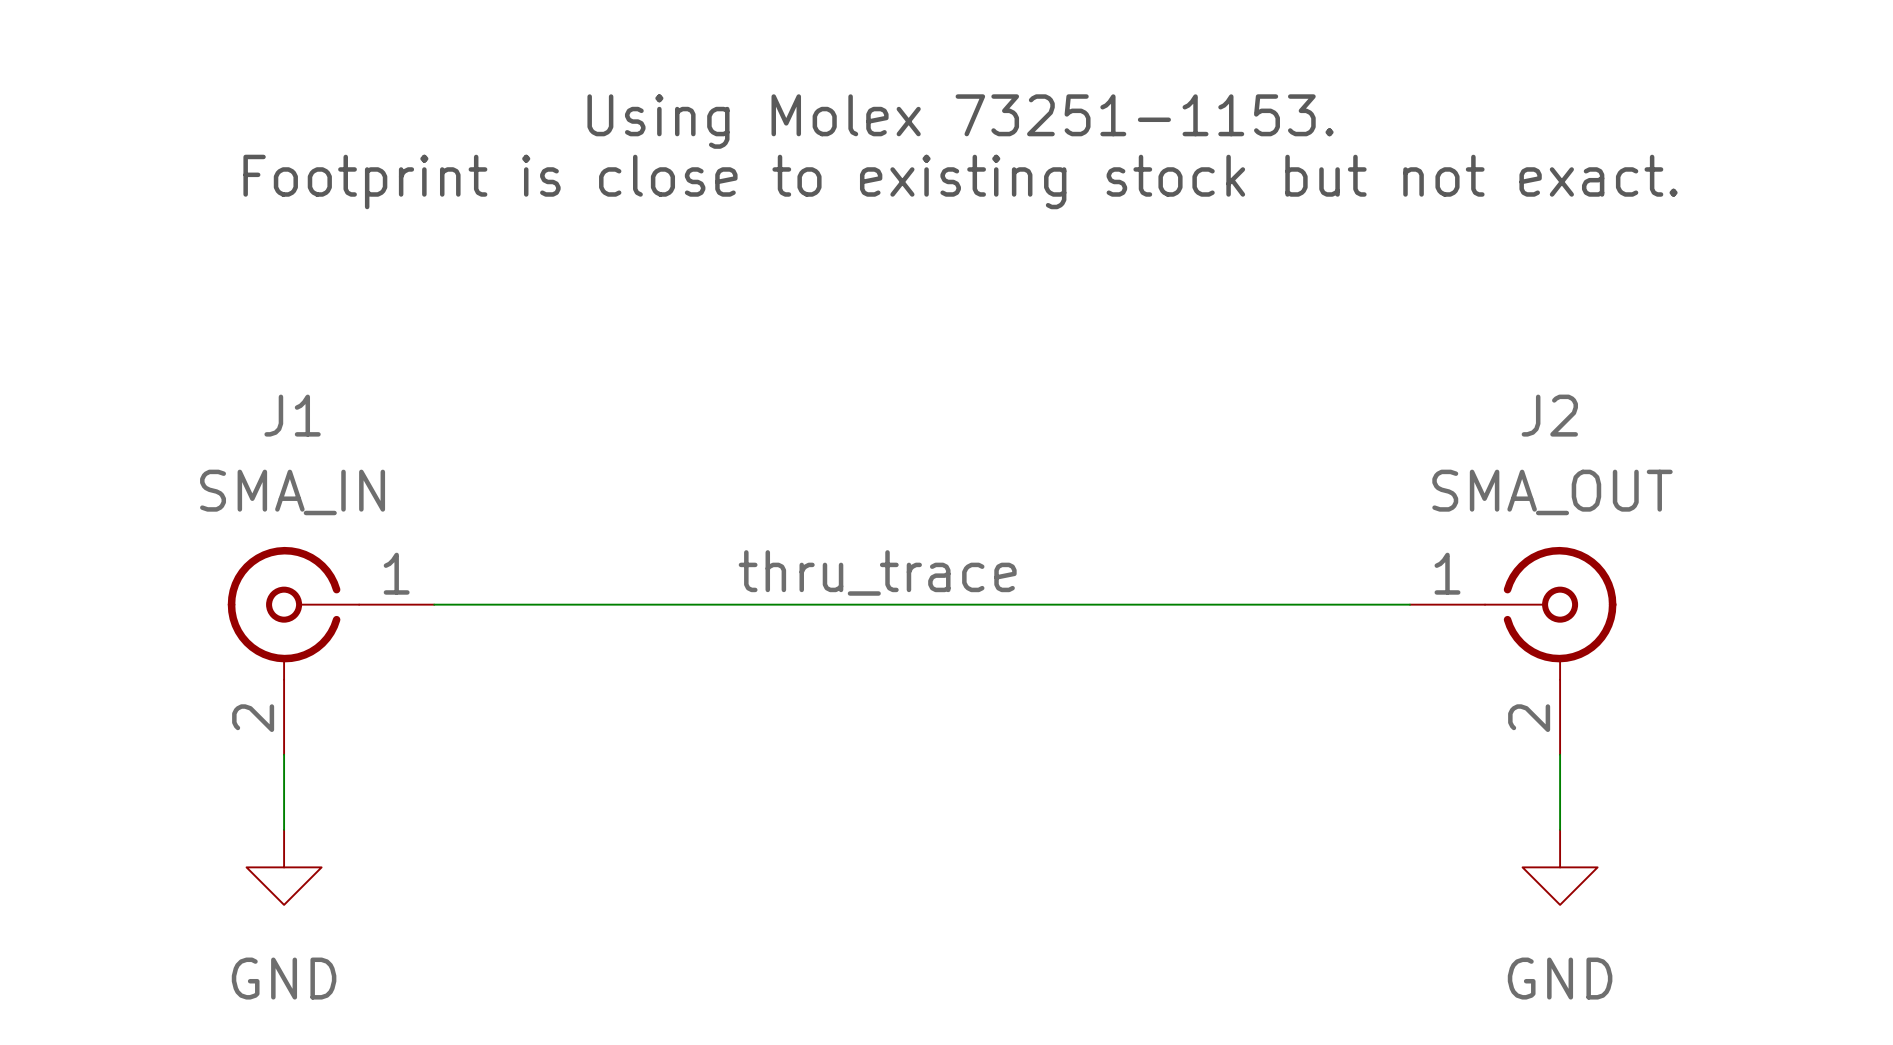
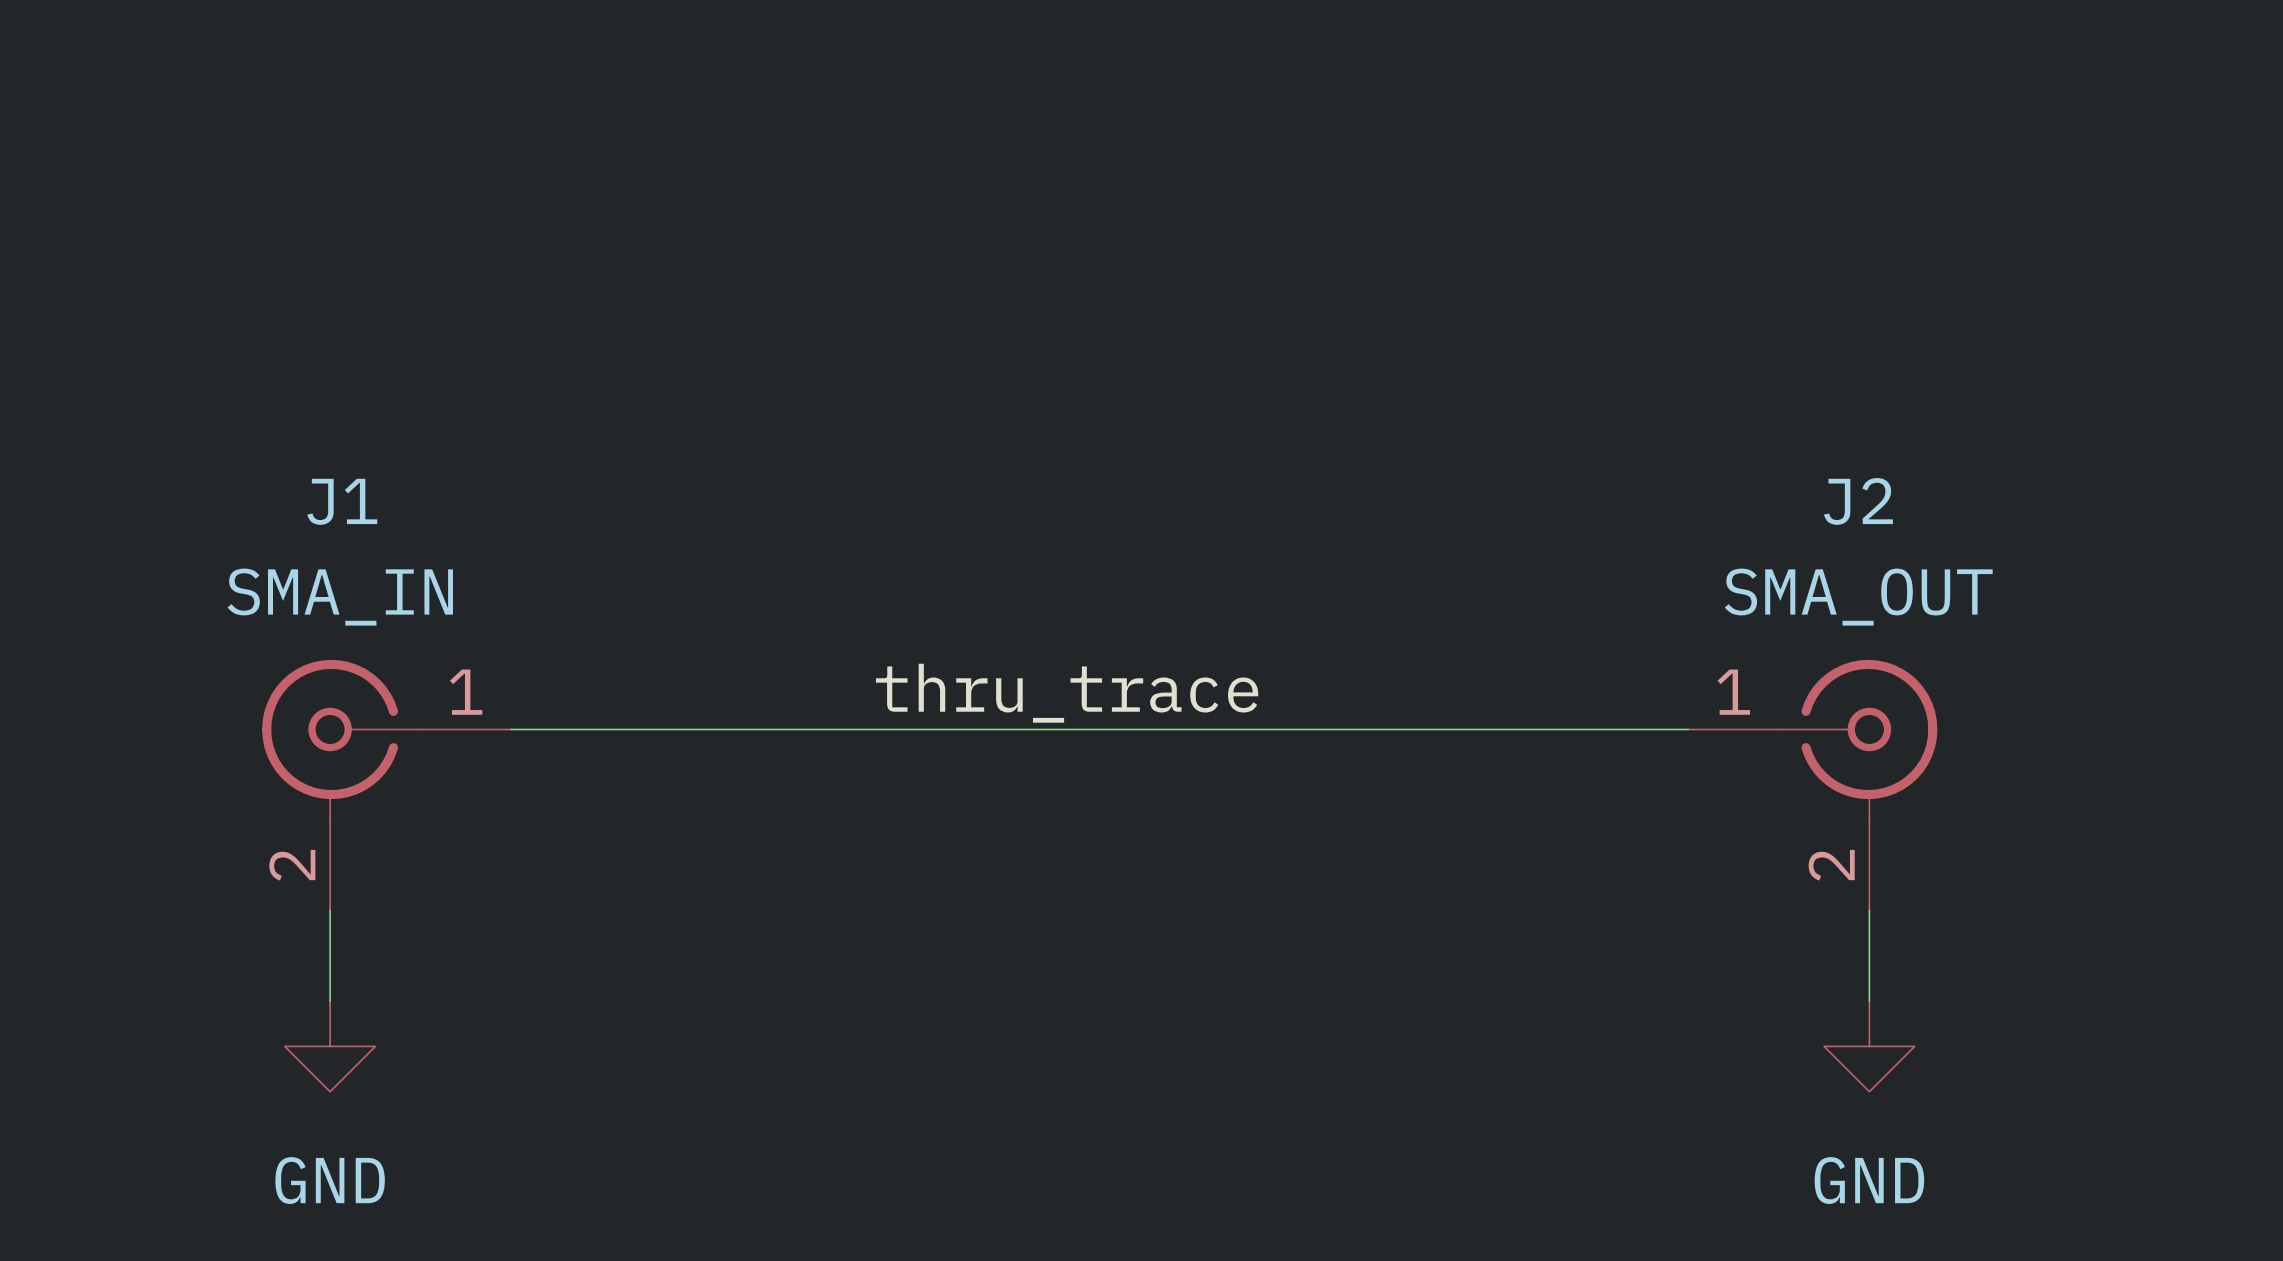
text: Using Molex 73251-1153. (960, 121) -> none
text: Footprint is close to existing stock but not exact. (960, 181) -> none

